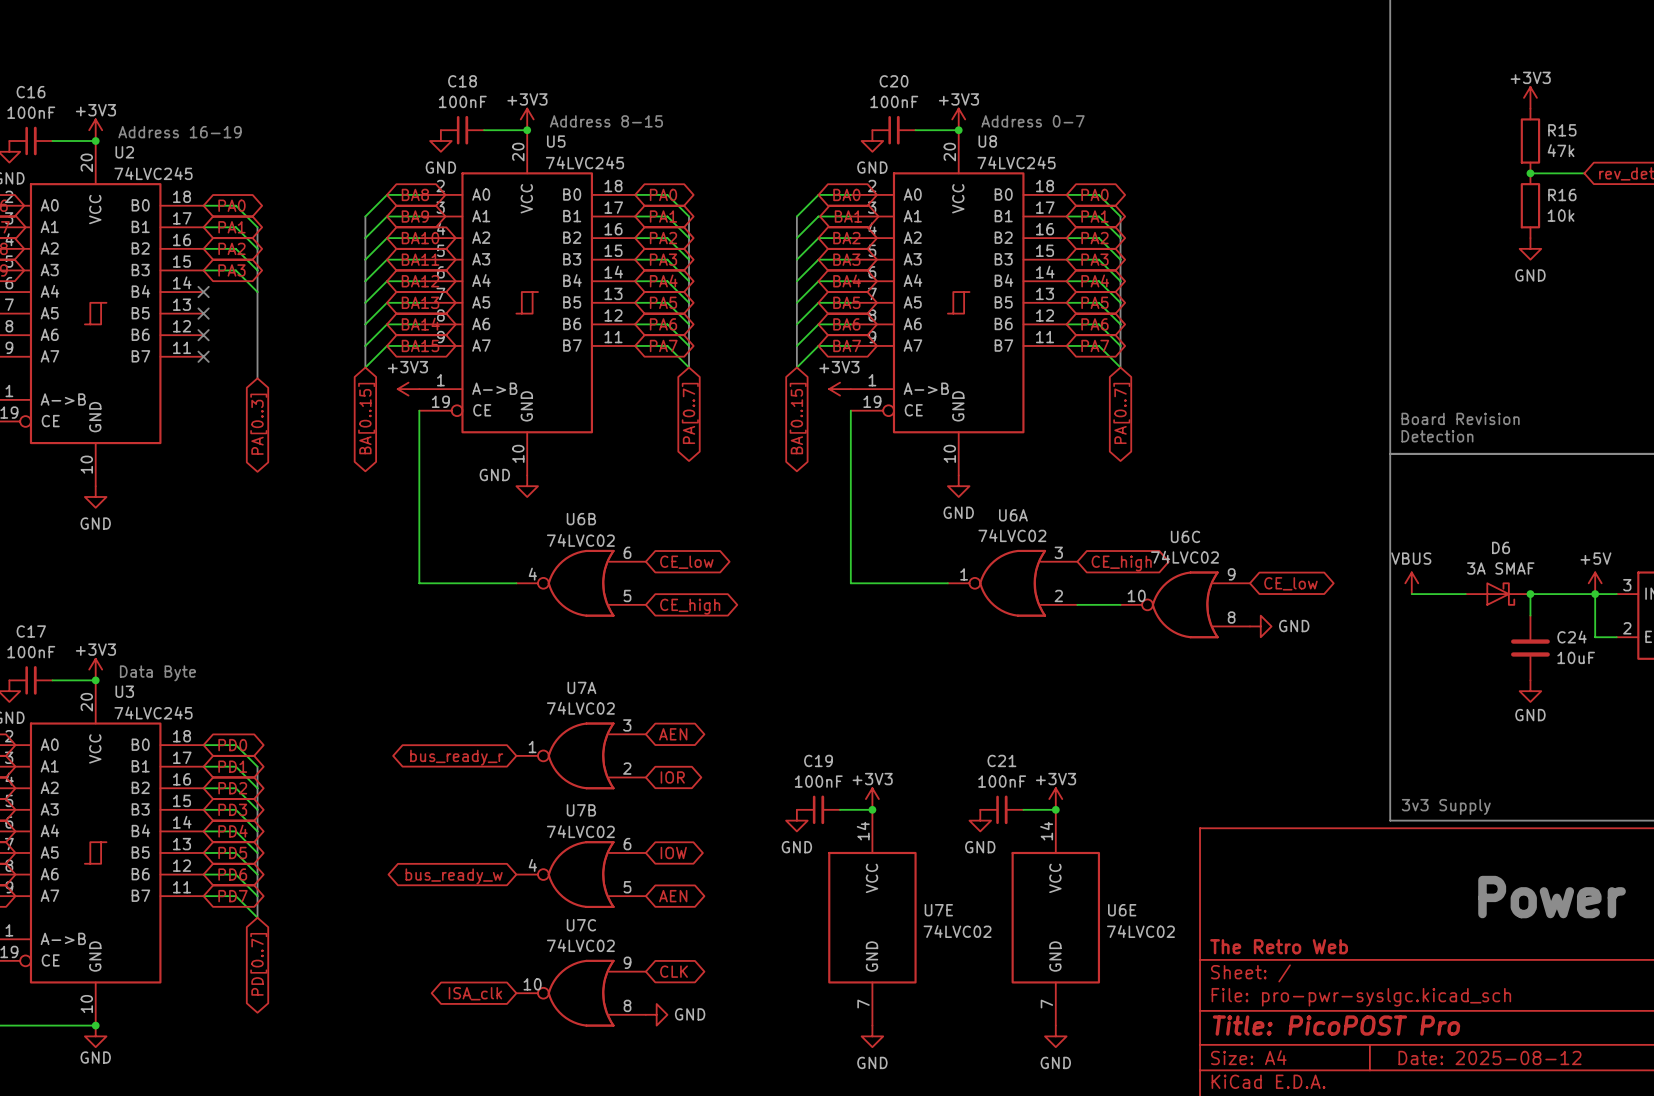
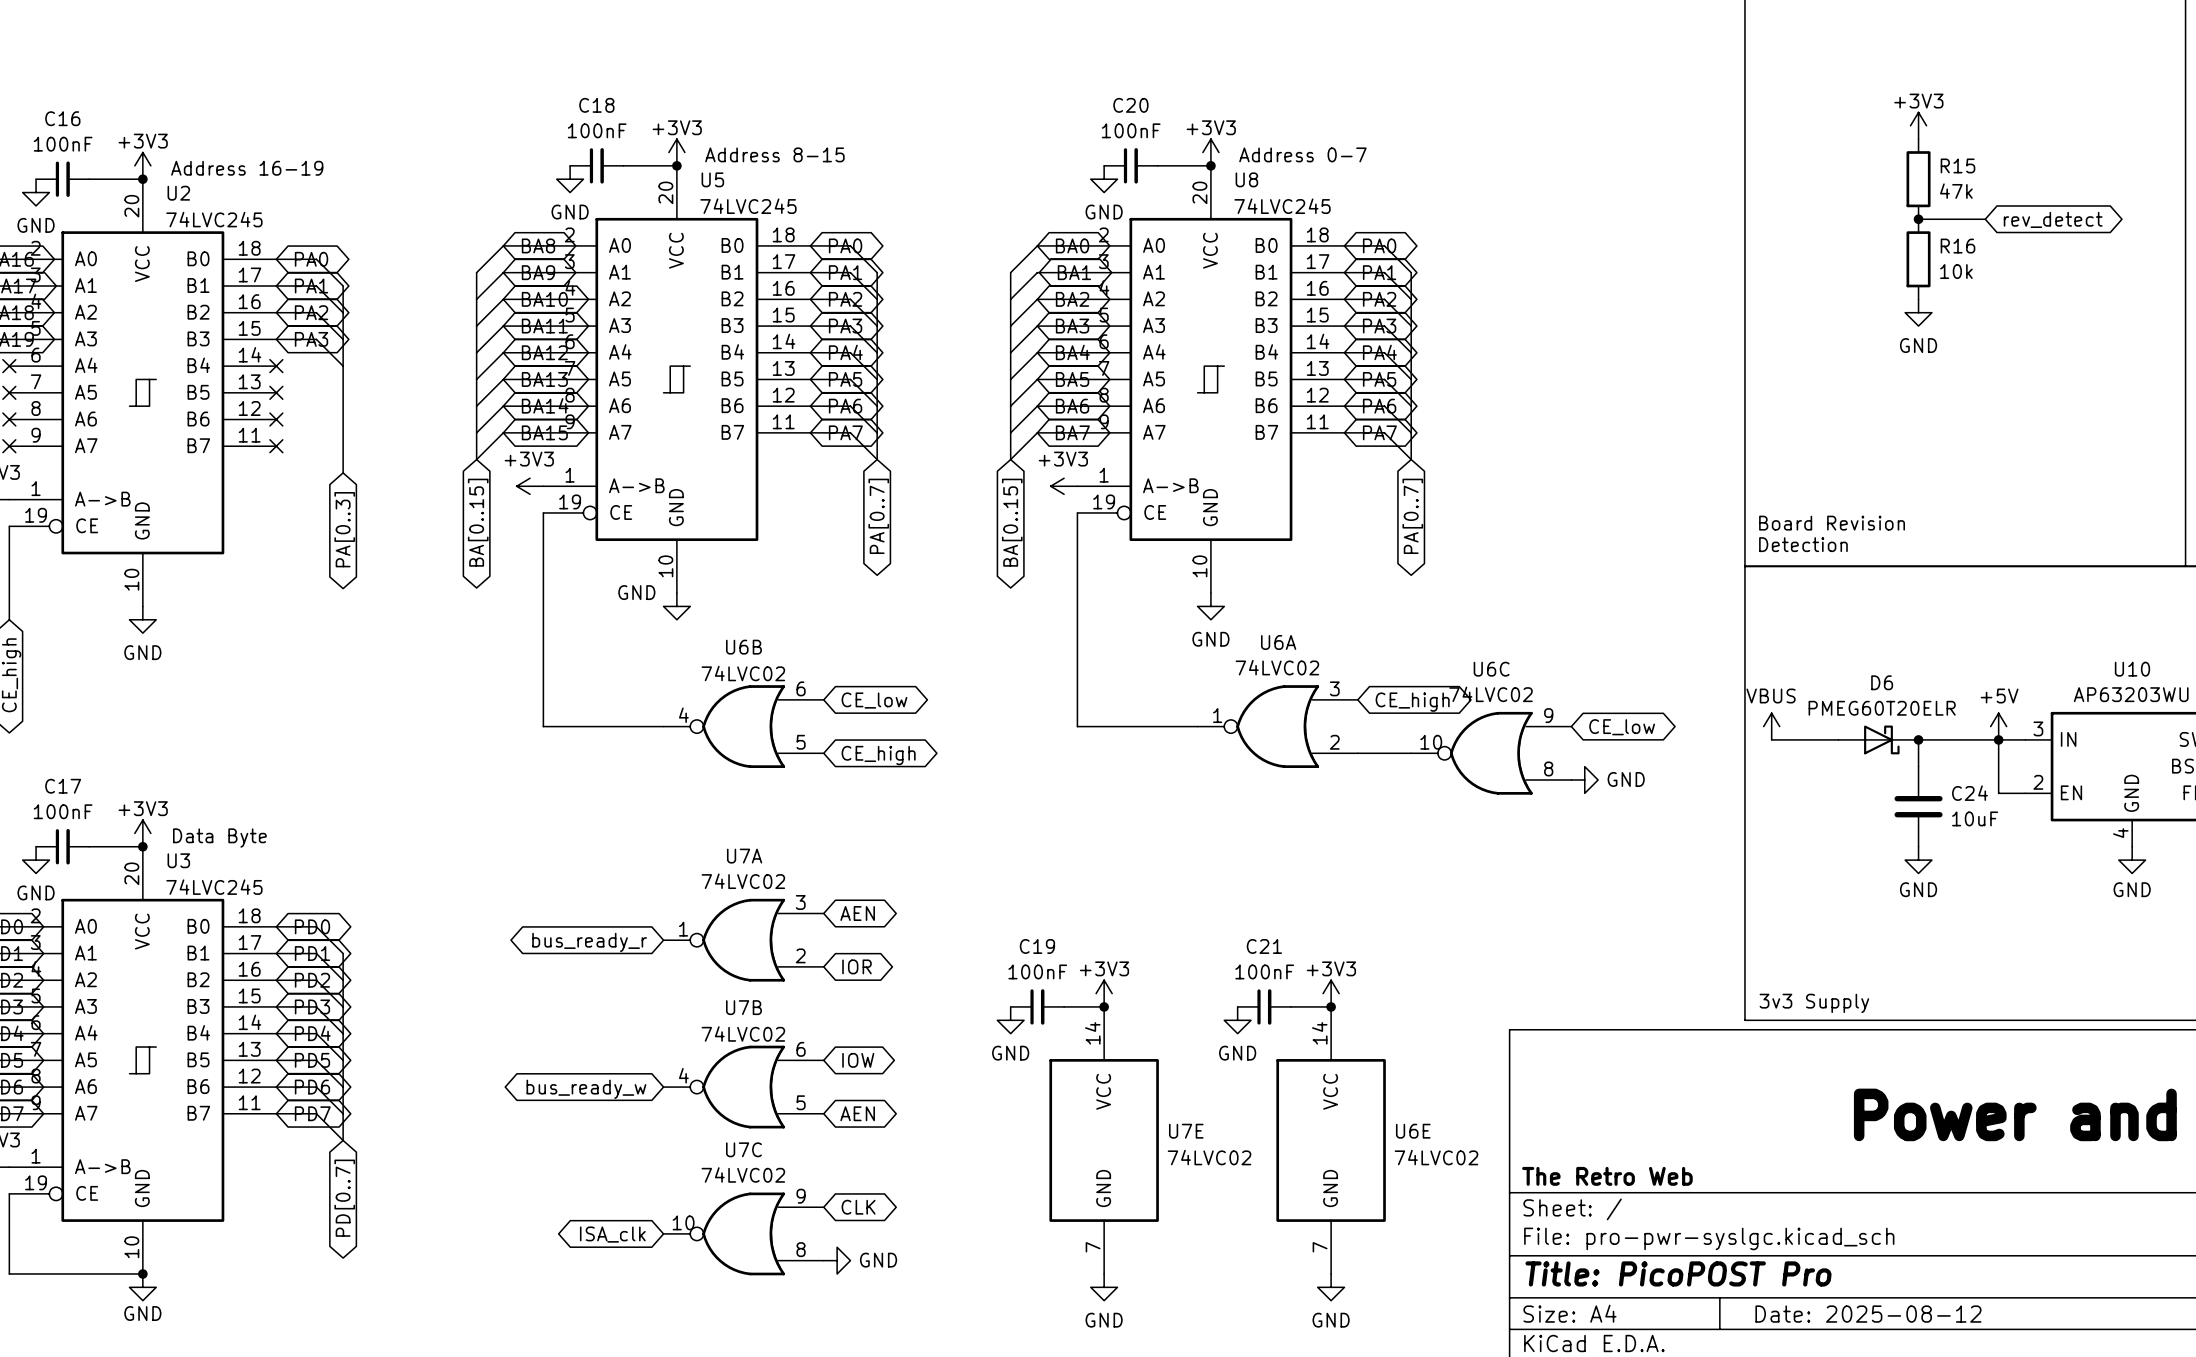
D6 value: 3A SMAF (1500, 568) -> PMEG60T20ELR (1882, 708)

